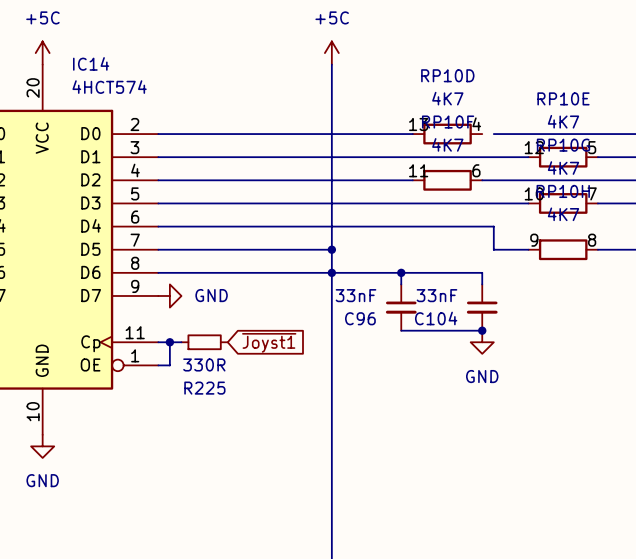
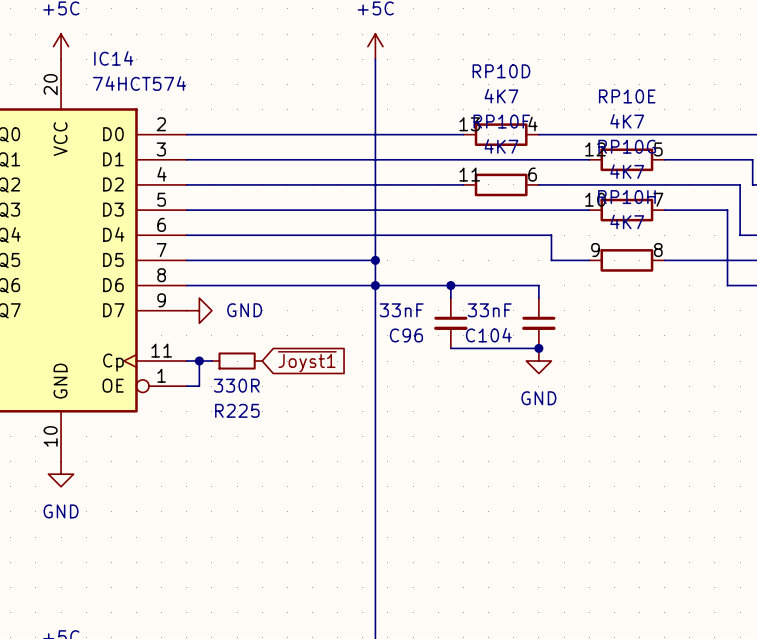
IC14 value: 4HCT574 (109, 87) -> 74HCT574 (139, 83)
wire: none -> (538, 134) (551, 134)

